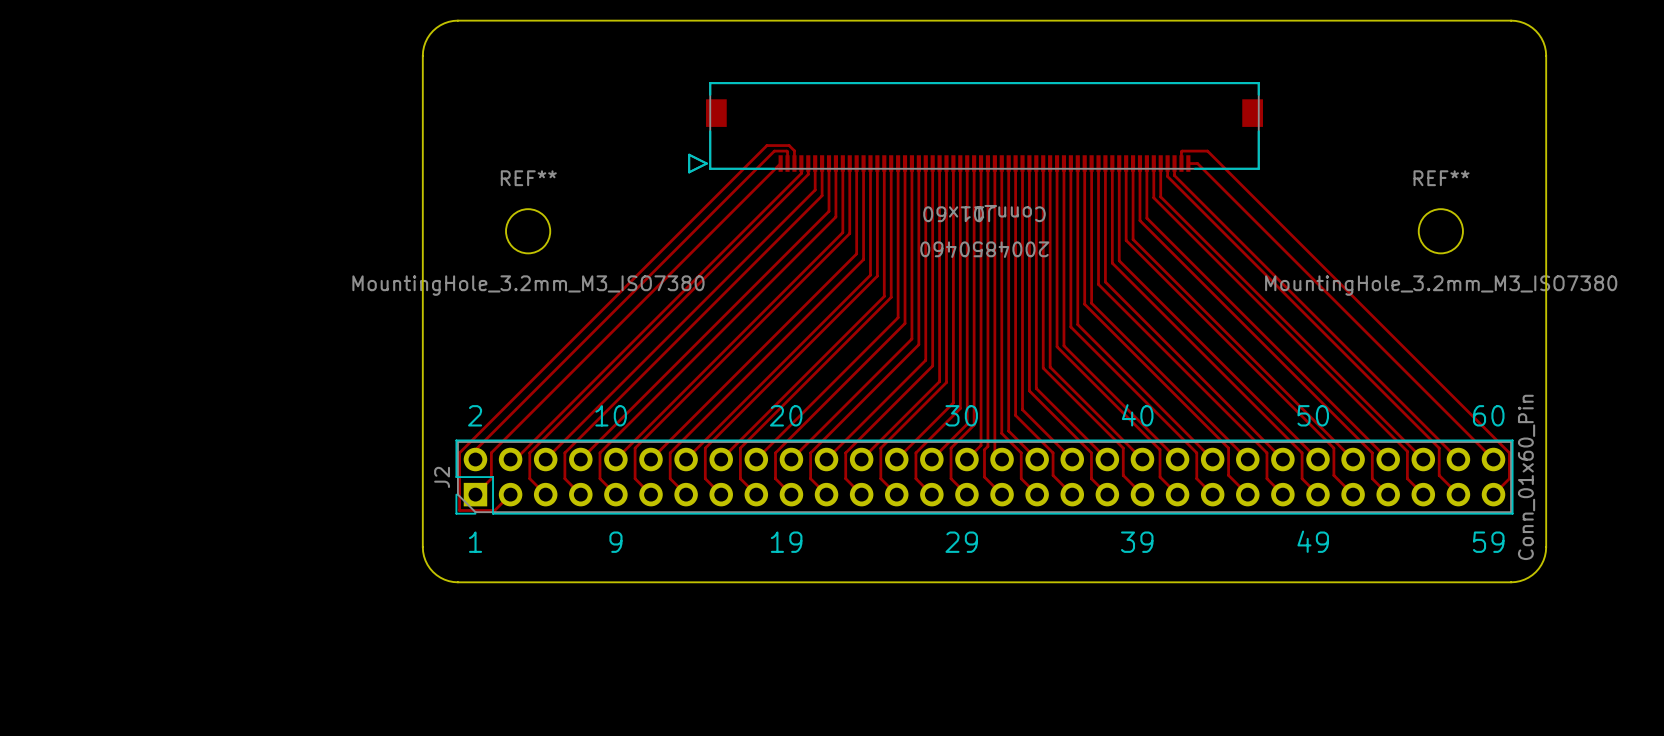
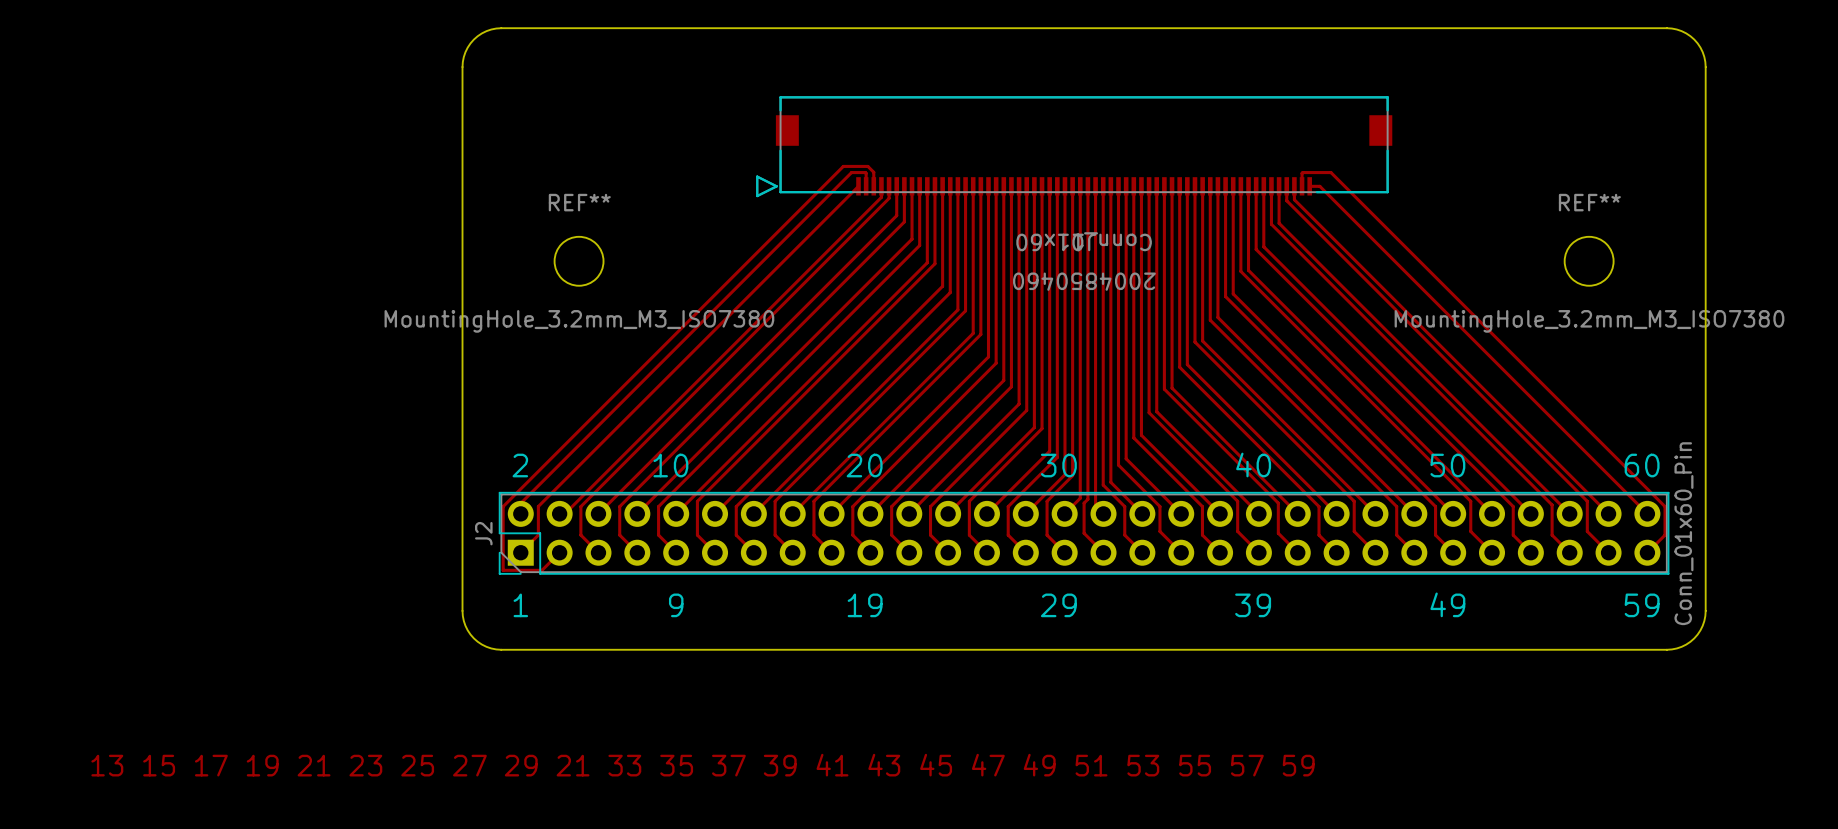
text: none -> 13 15 17 19 21 23 25 27 29 21 33 35 37 39 41 43 45 47 49 51 53 55 57 59 (703, 765)

